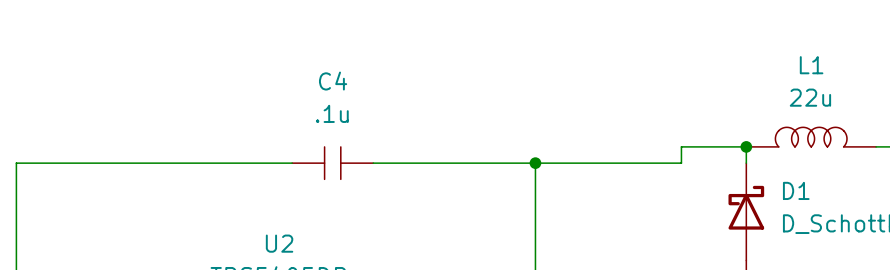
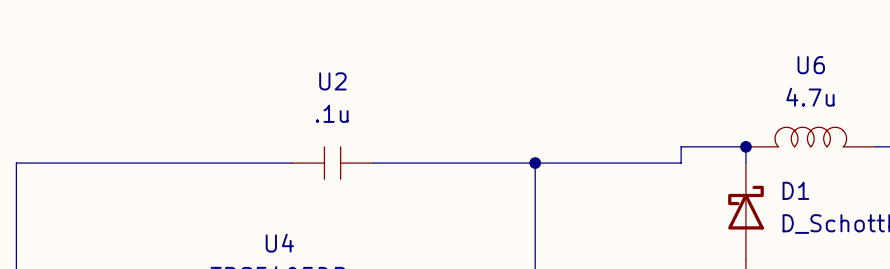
L1 name: L1 (811, 65) -> U6 (811, 65)
C4 name: C4 (333, 81) -> U2 (332, 81)
L1 value: 22u (810, 97) -> 4.7u (810, 97)
U2 name: U2 (279, 243) -> U4 (279, 243)

